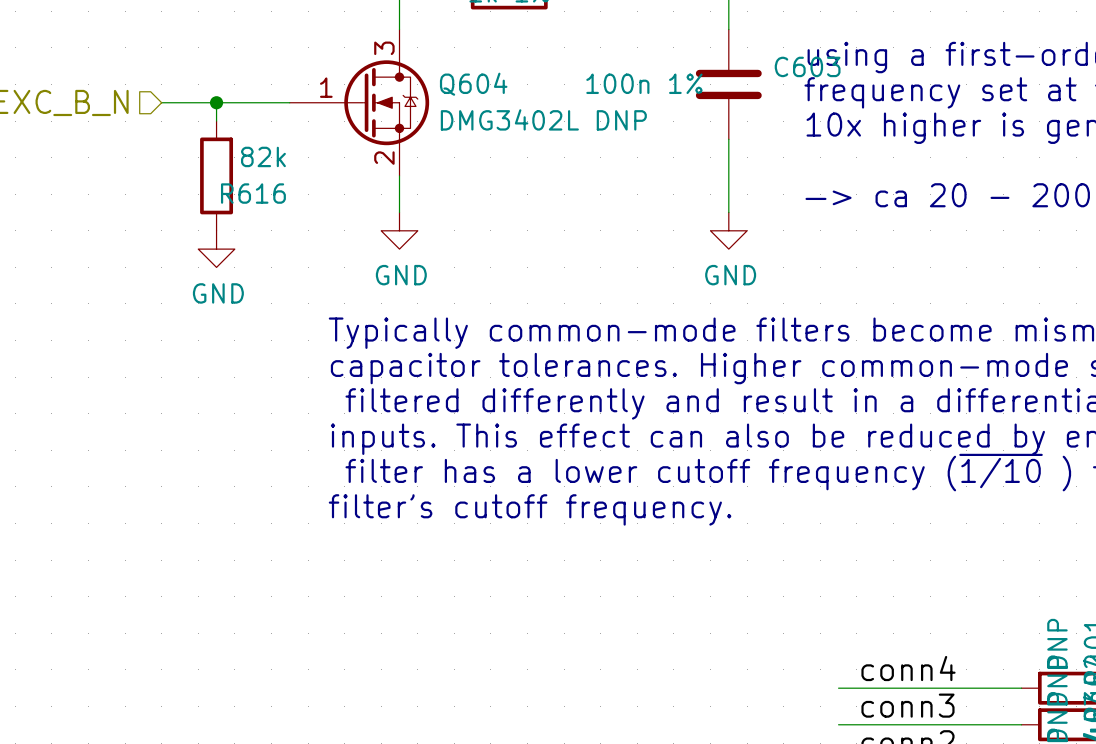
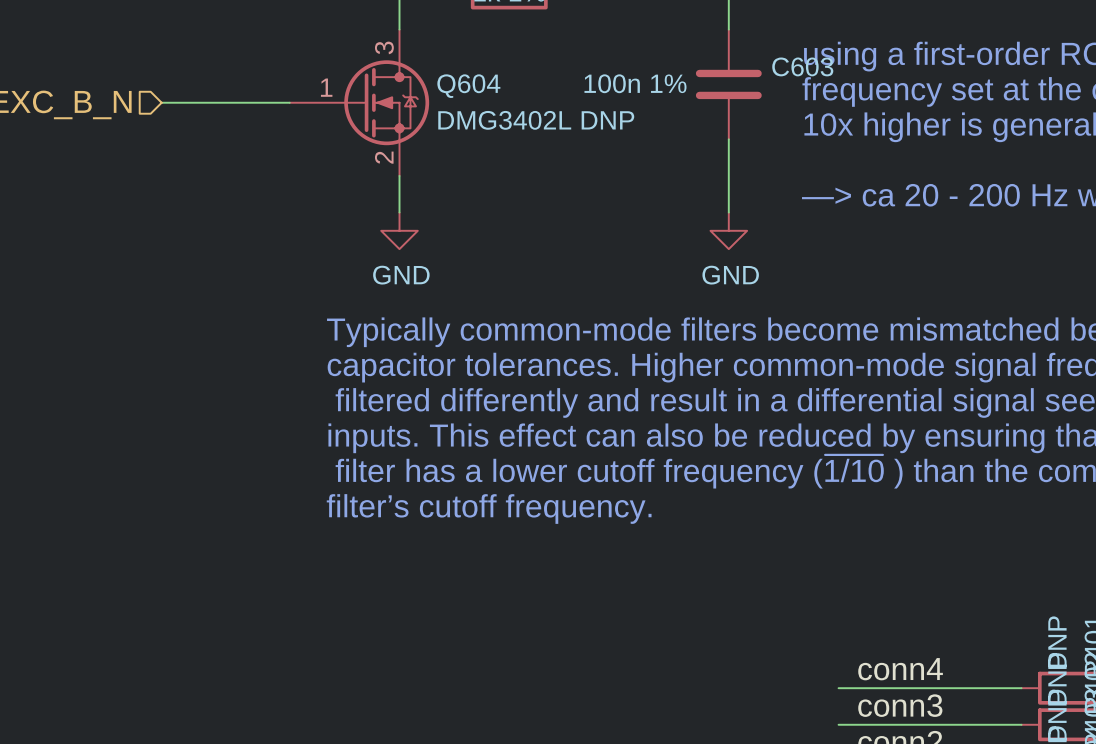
wire: (216, 102) (216, 121) -> none
junction: (216, 102) -> none
R616: 82k (216, 175) -> none
power symbol: GND (216, 249) -> none

